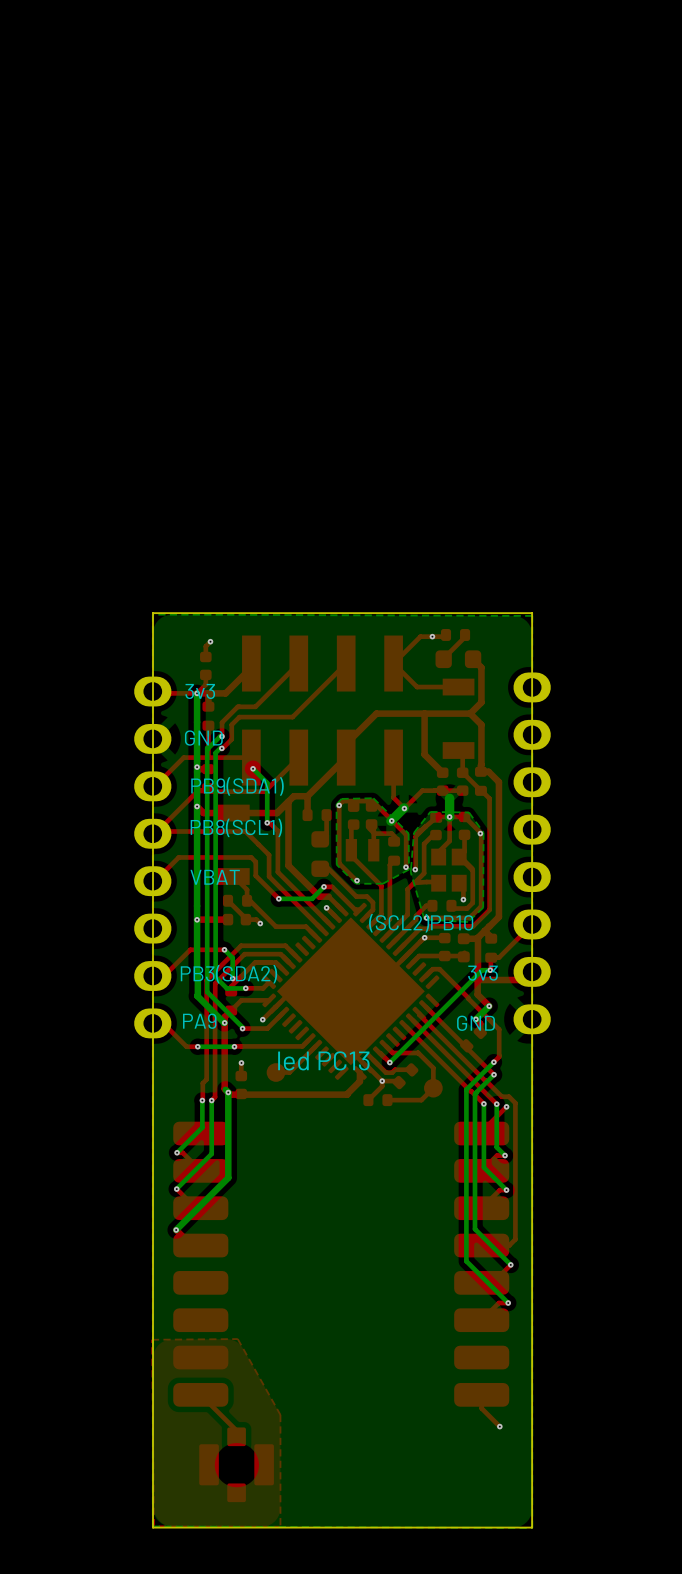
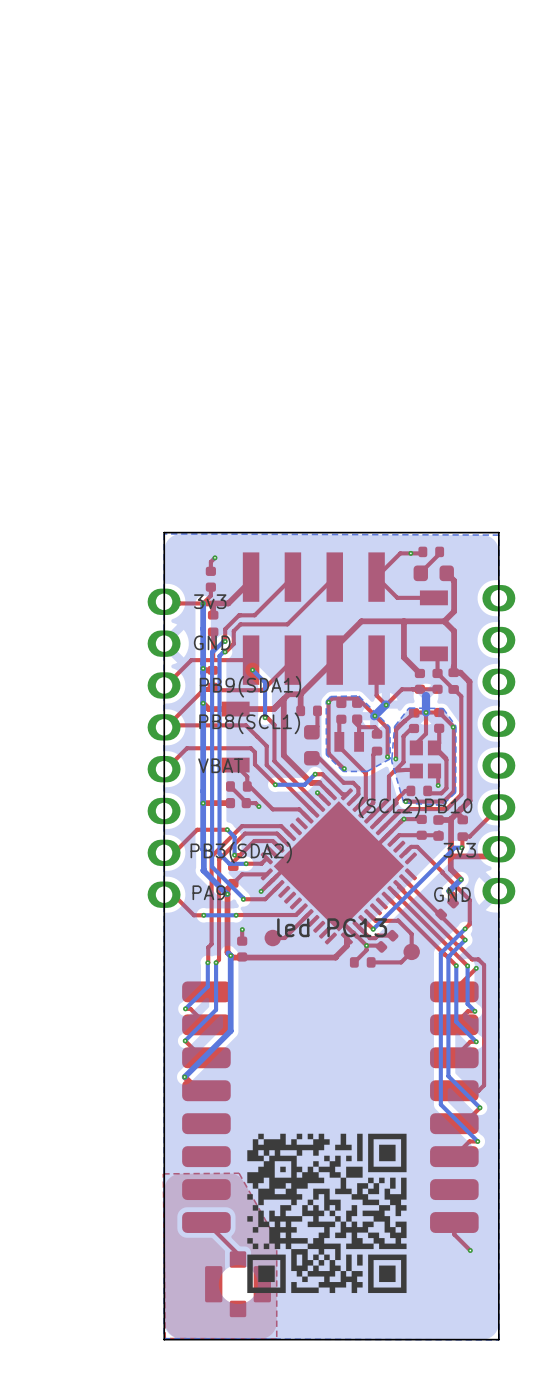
drawing: none -> [247, 1133, 407, 1294]

